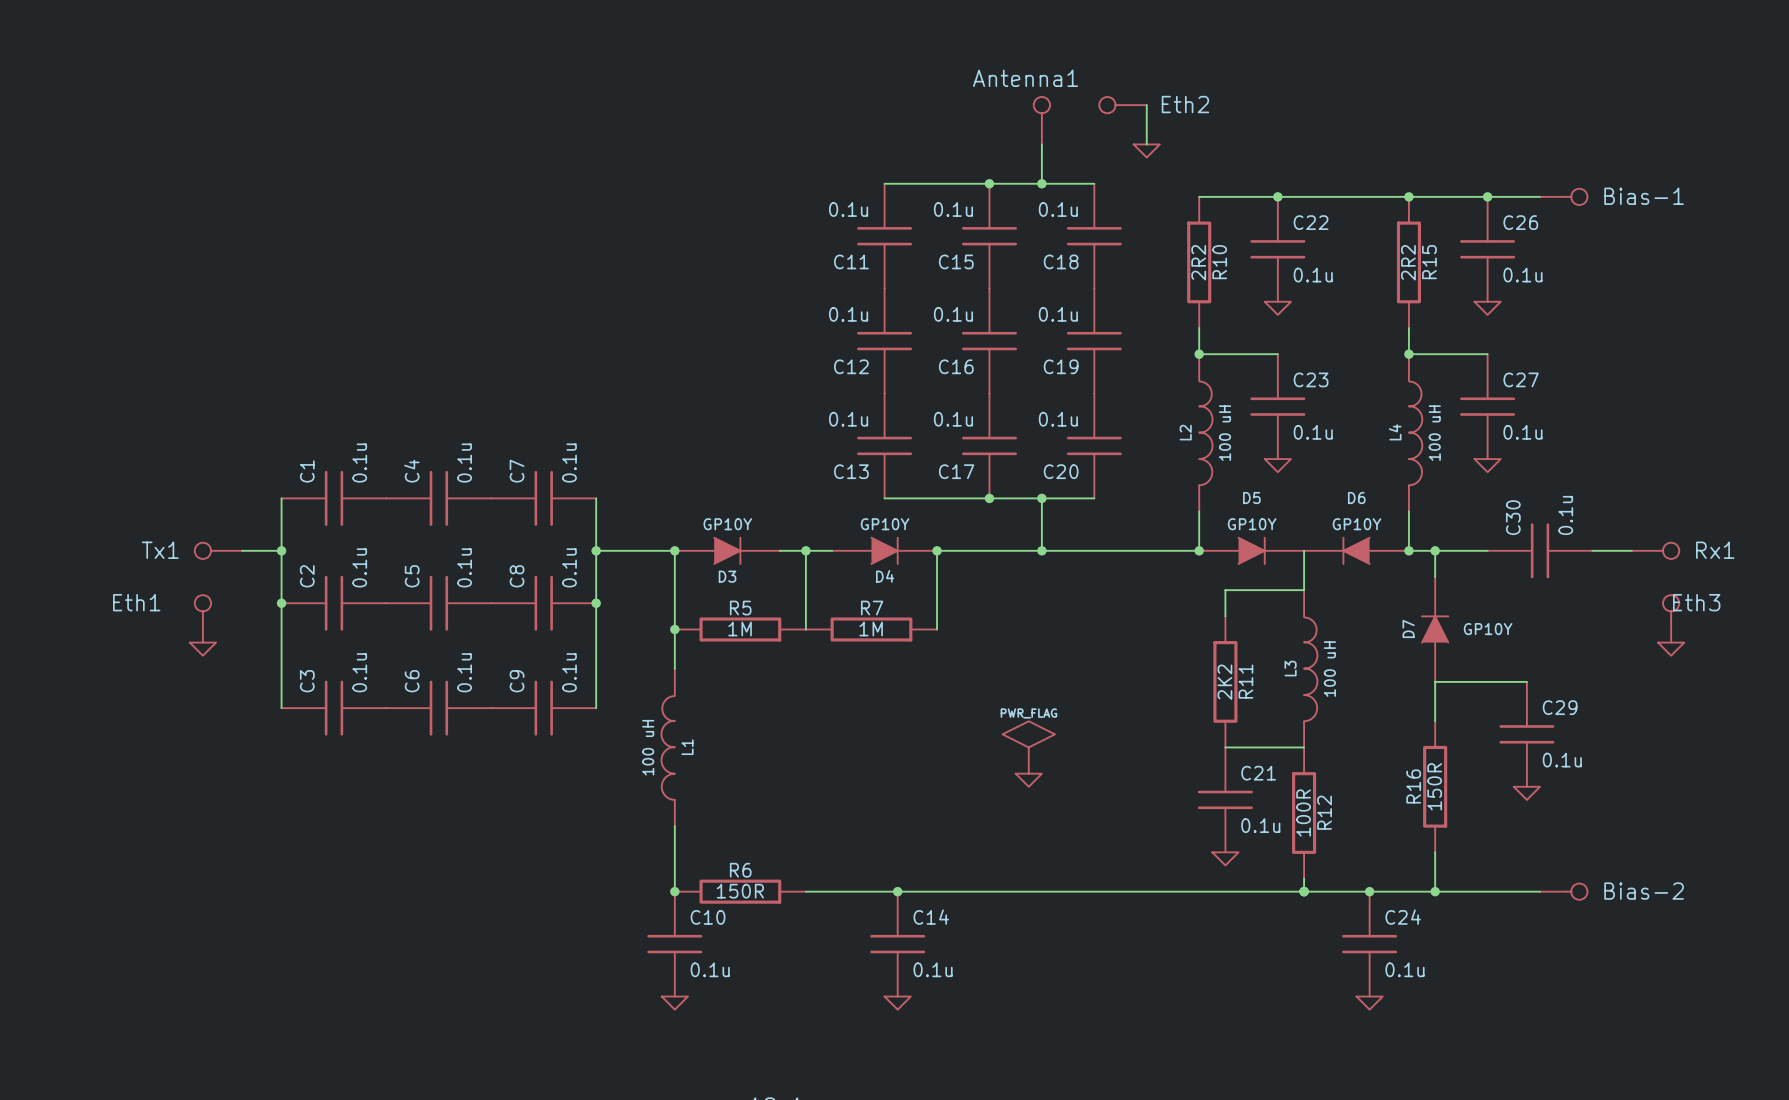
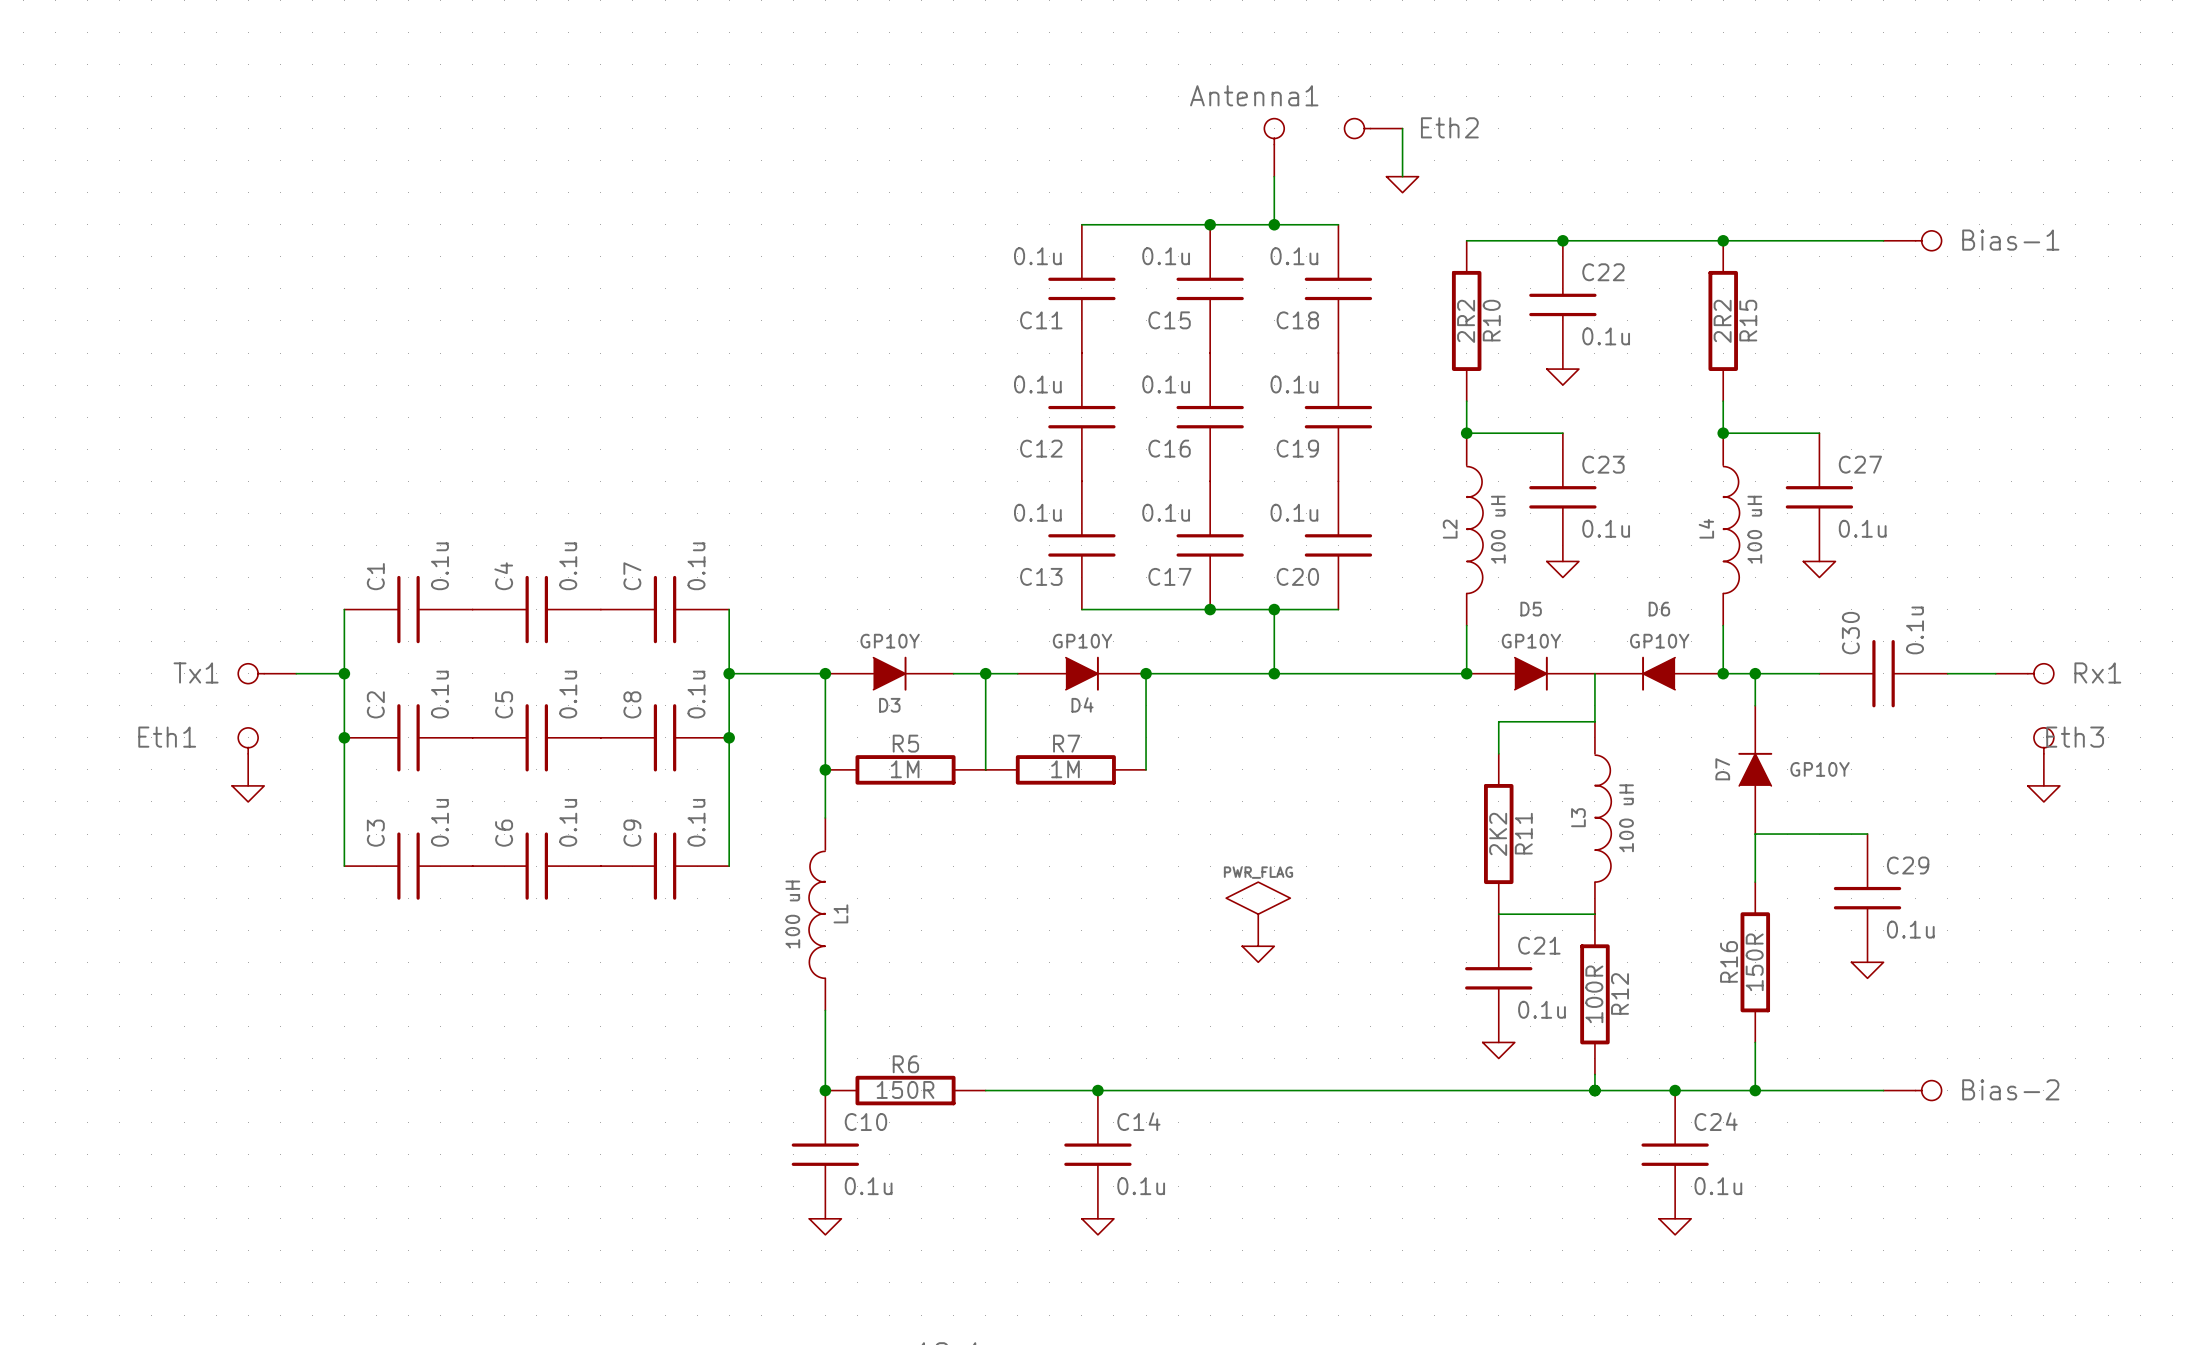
junction: (1487, 196) -> none
C26: 0.1u (1487, 249) -> none
power symbol: (1487, 308) -> none

